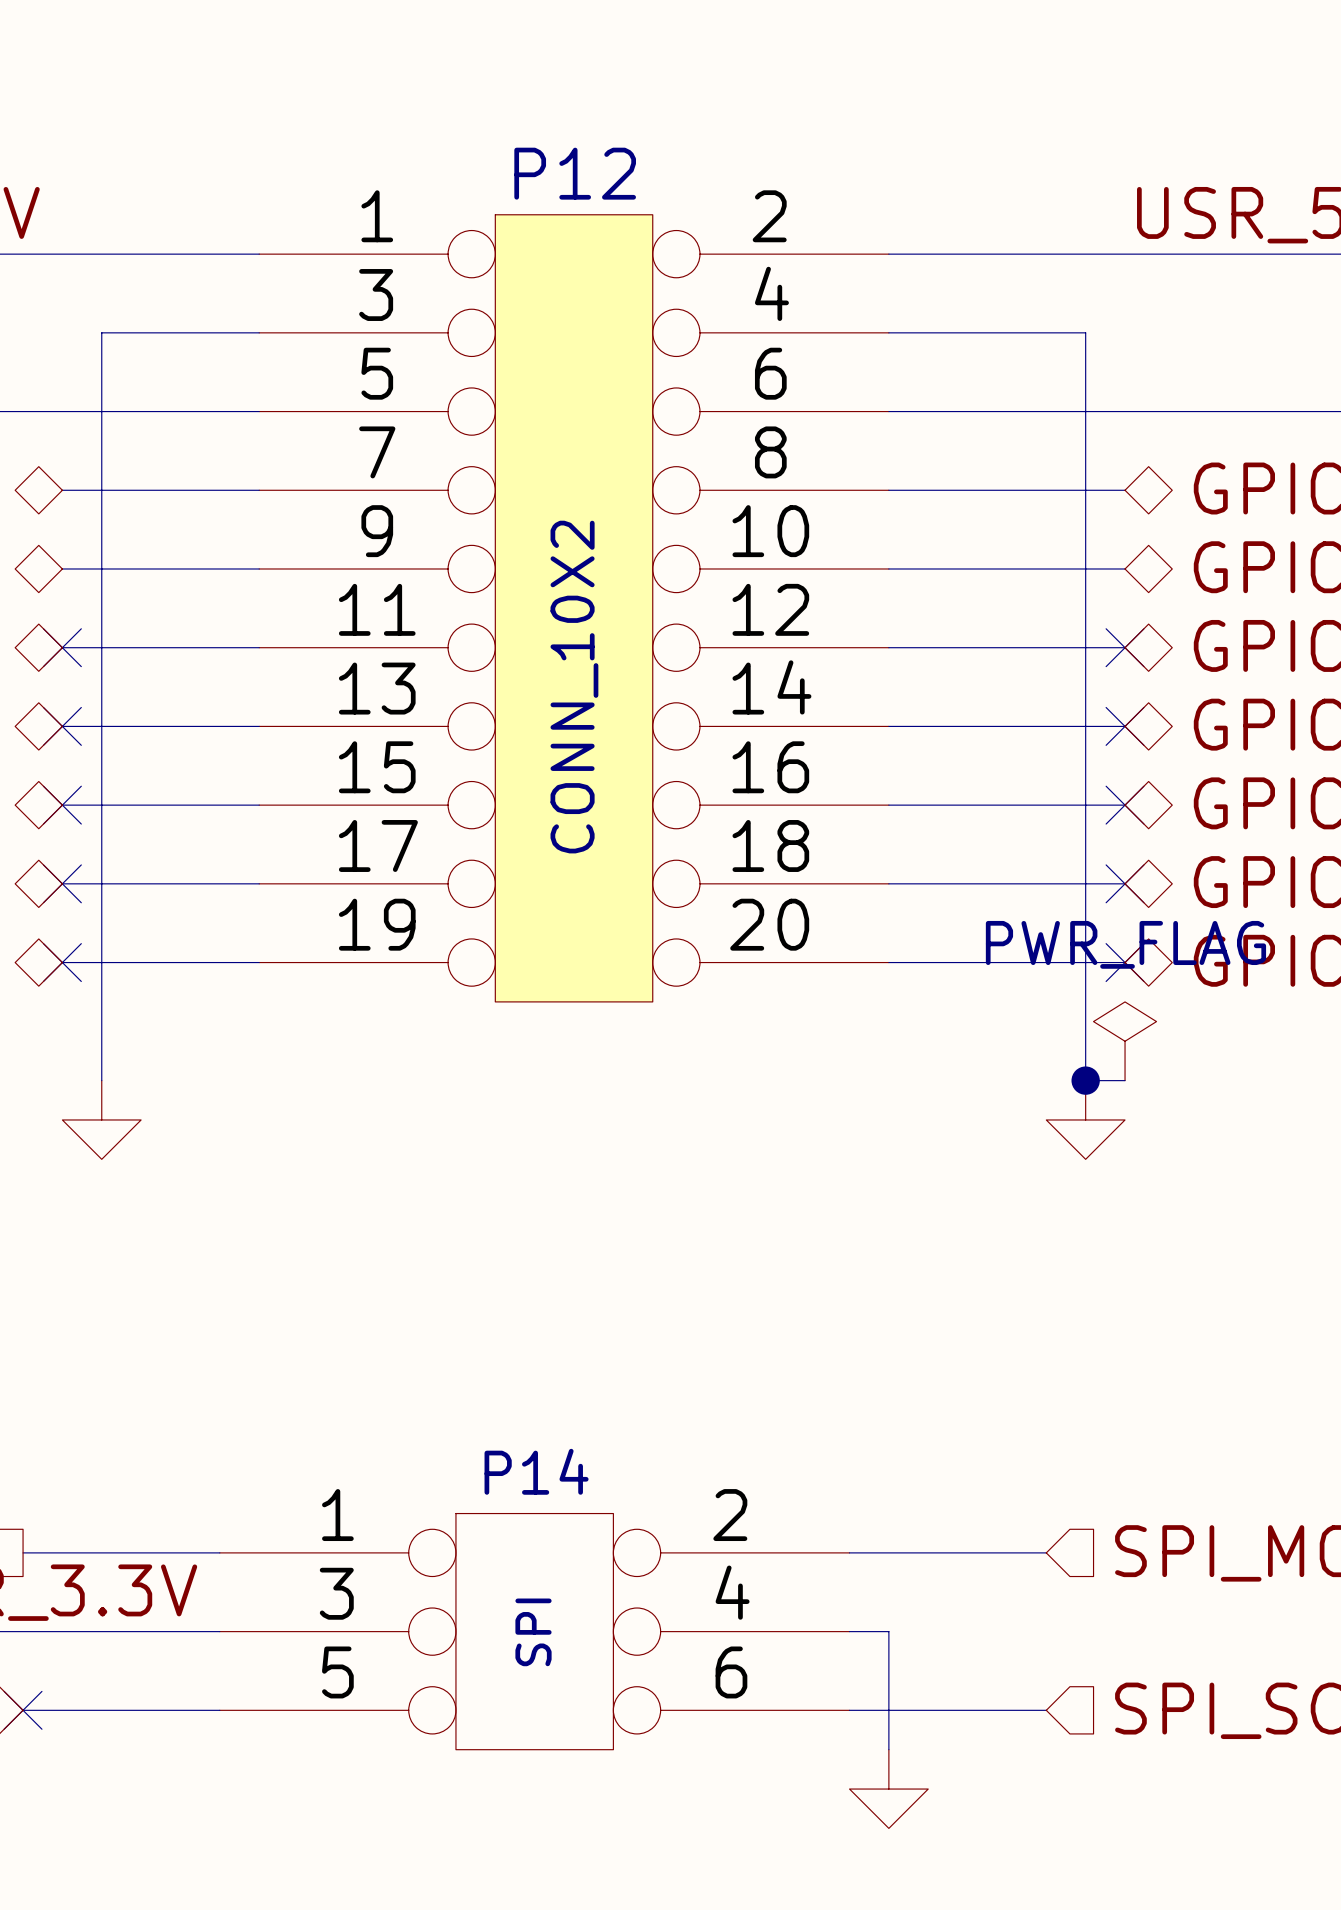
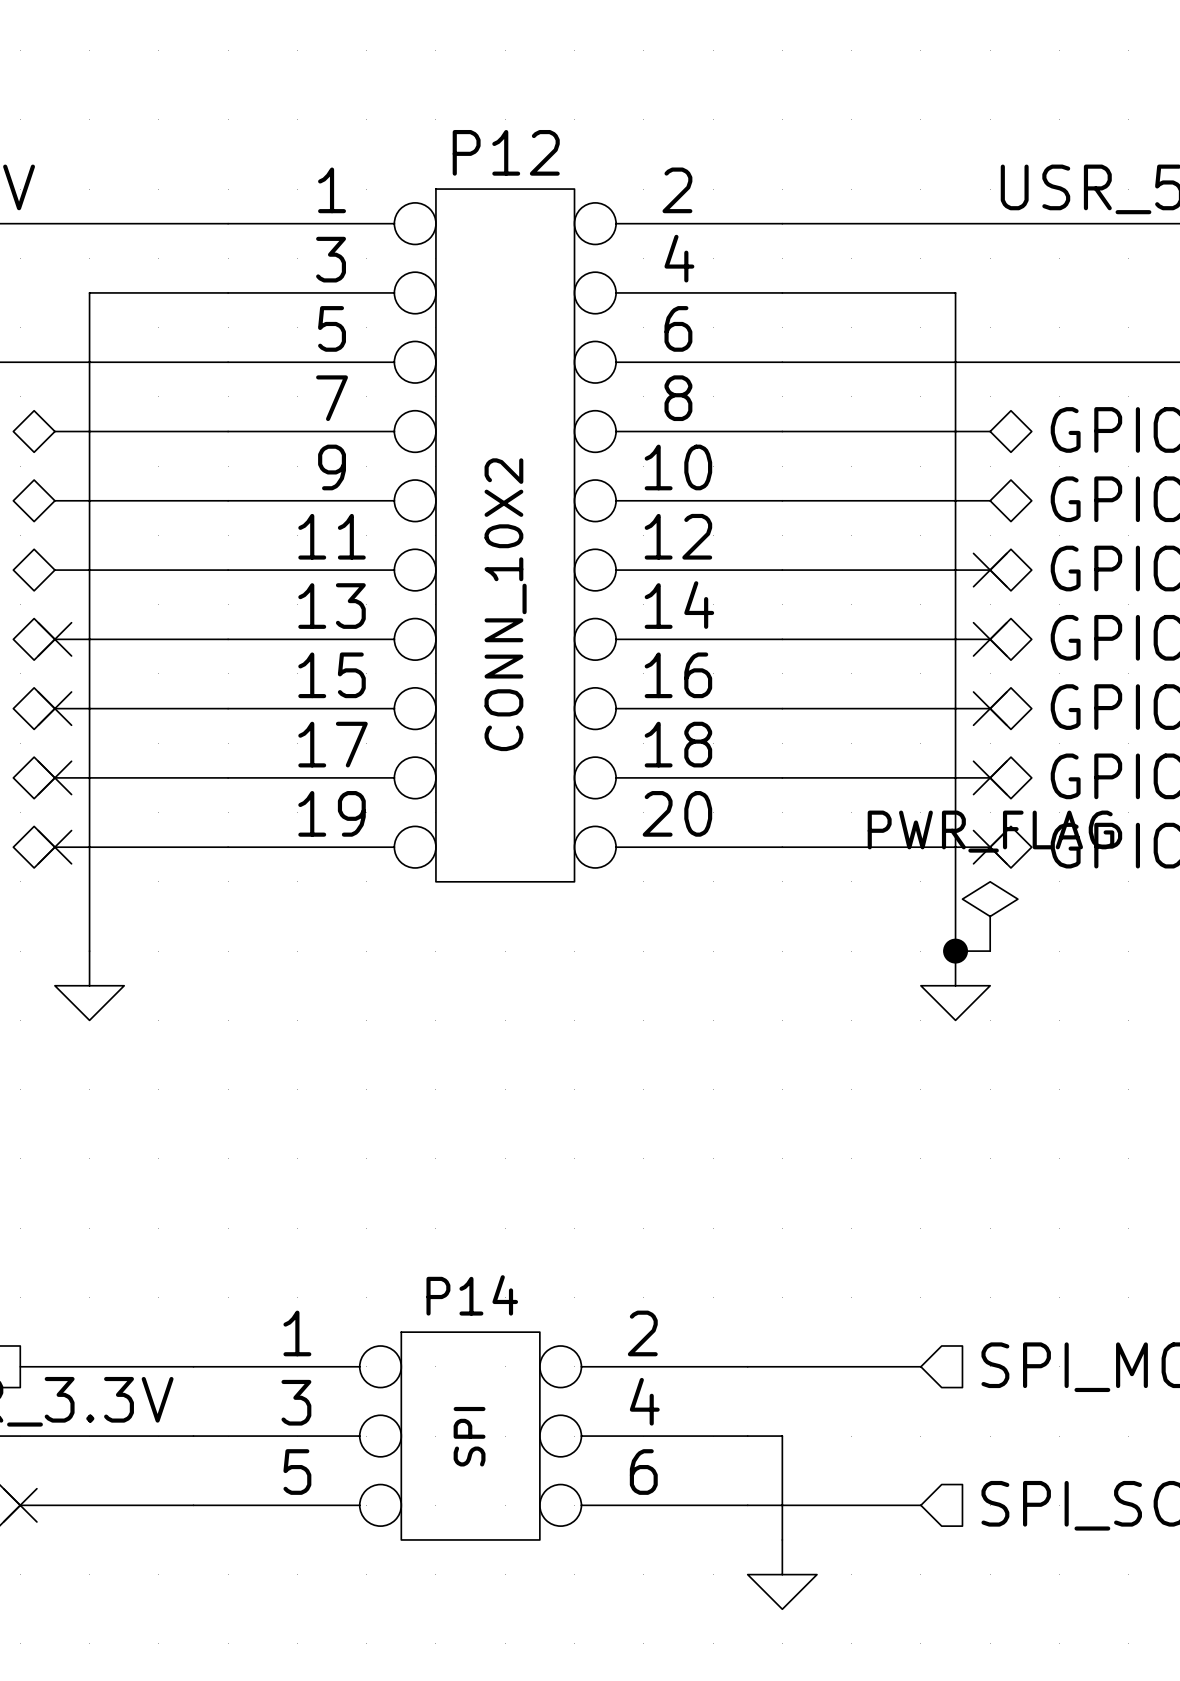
no-connect mark: (62, 647) -> none

